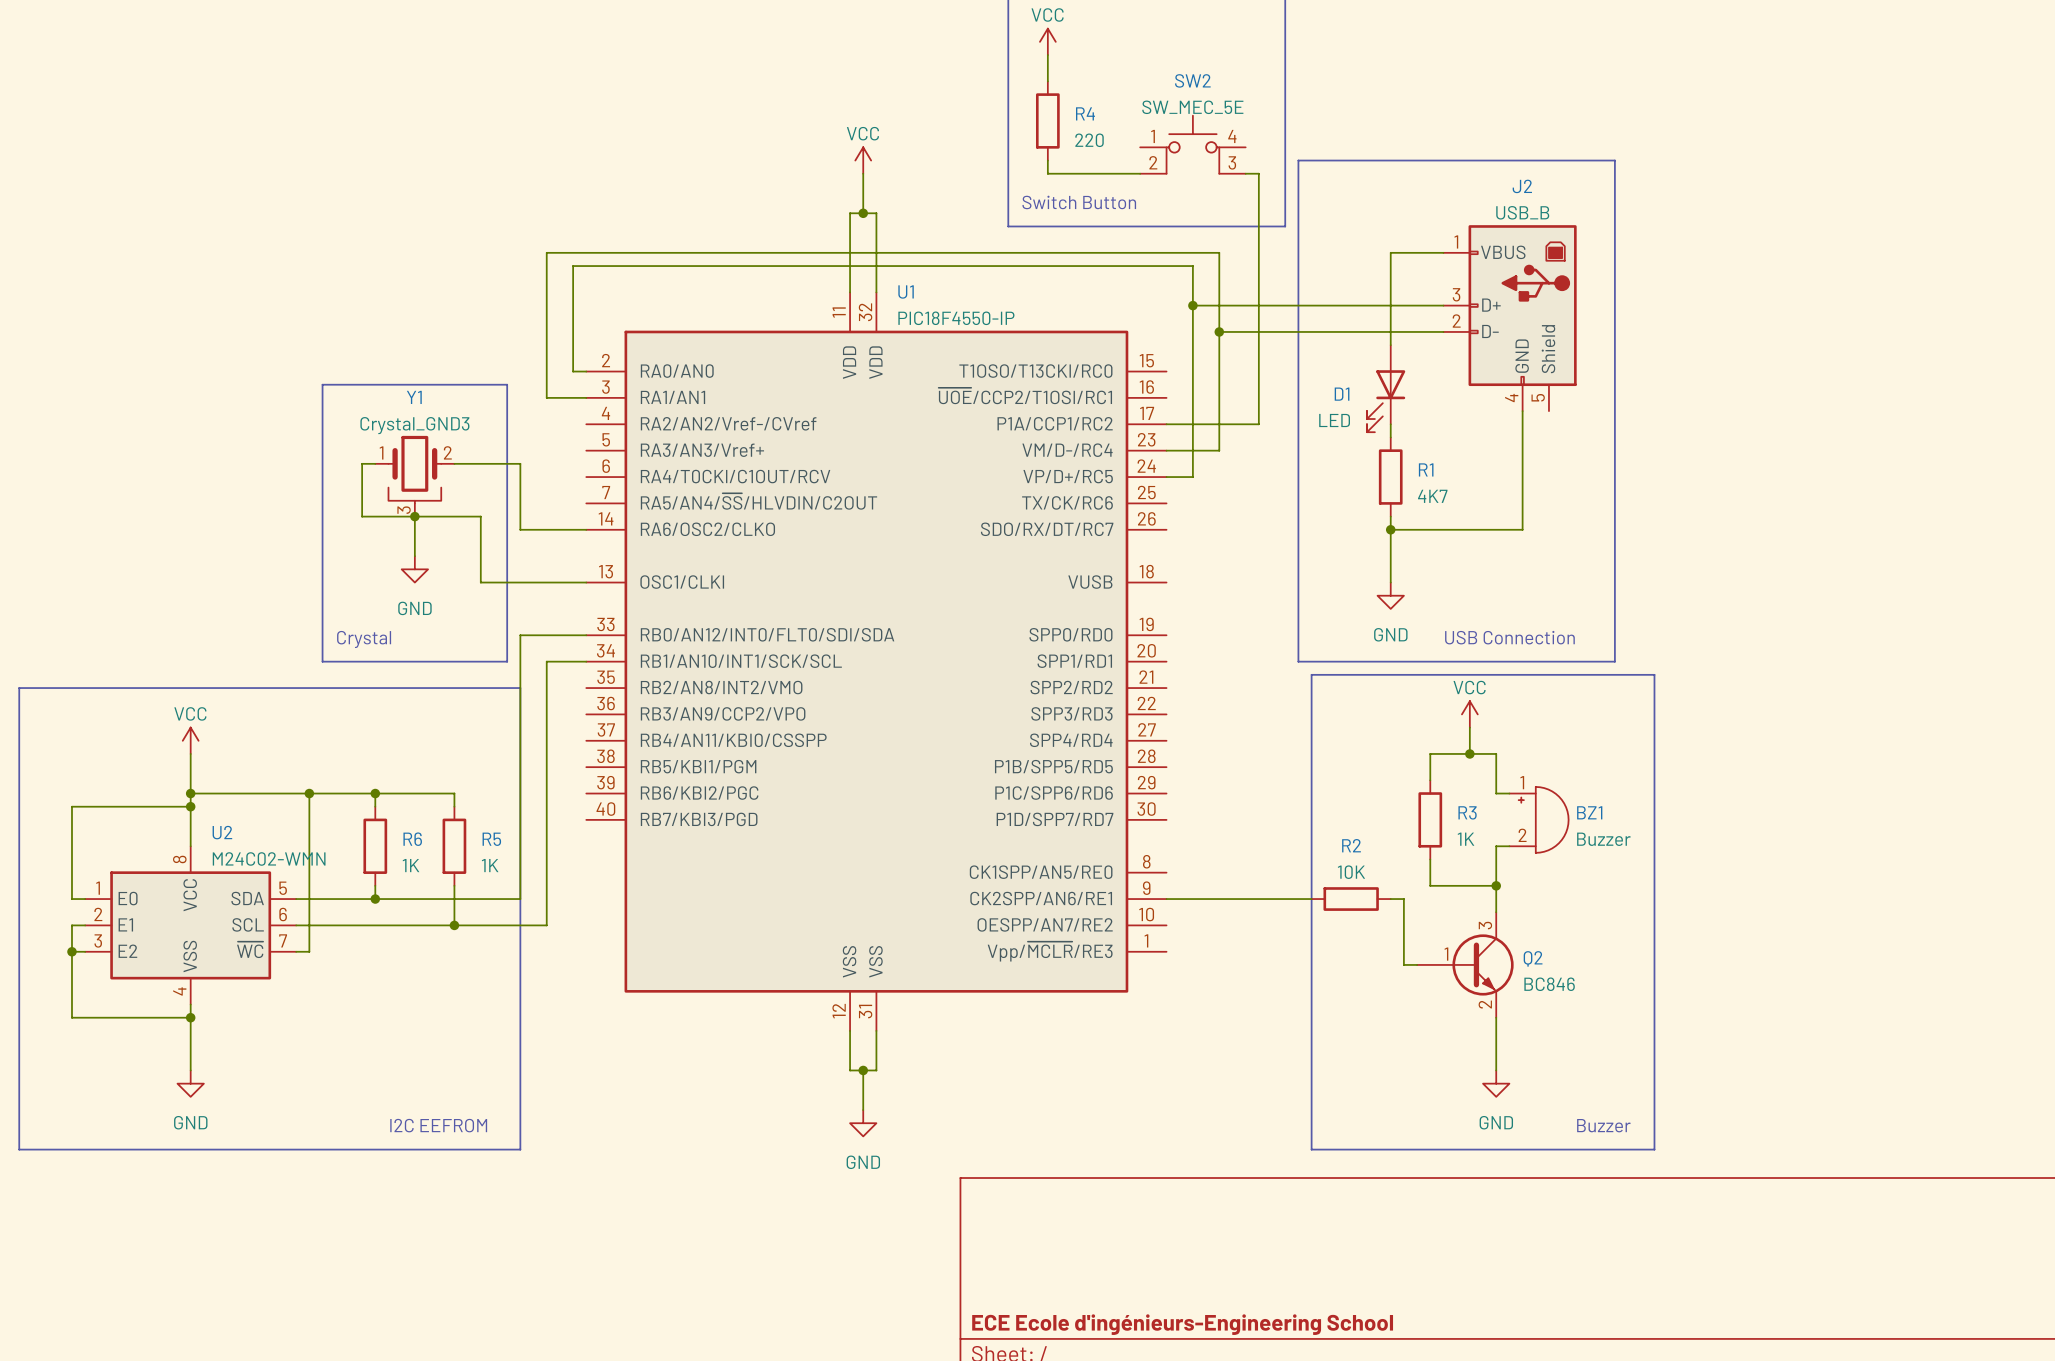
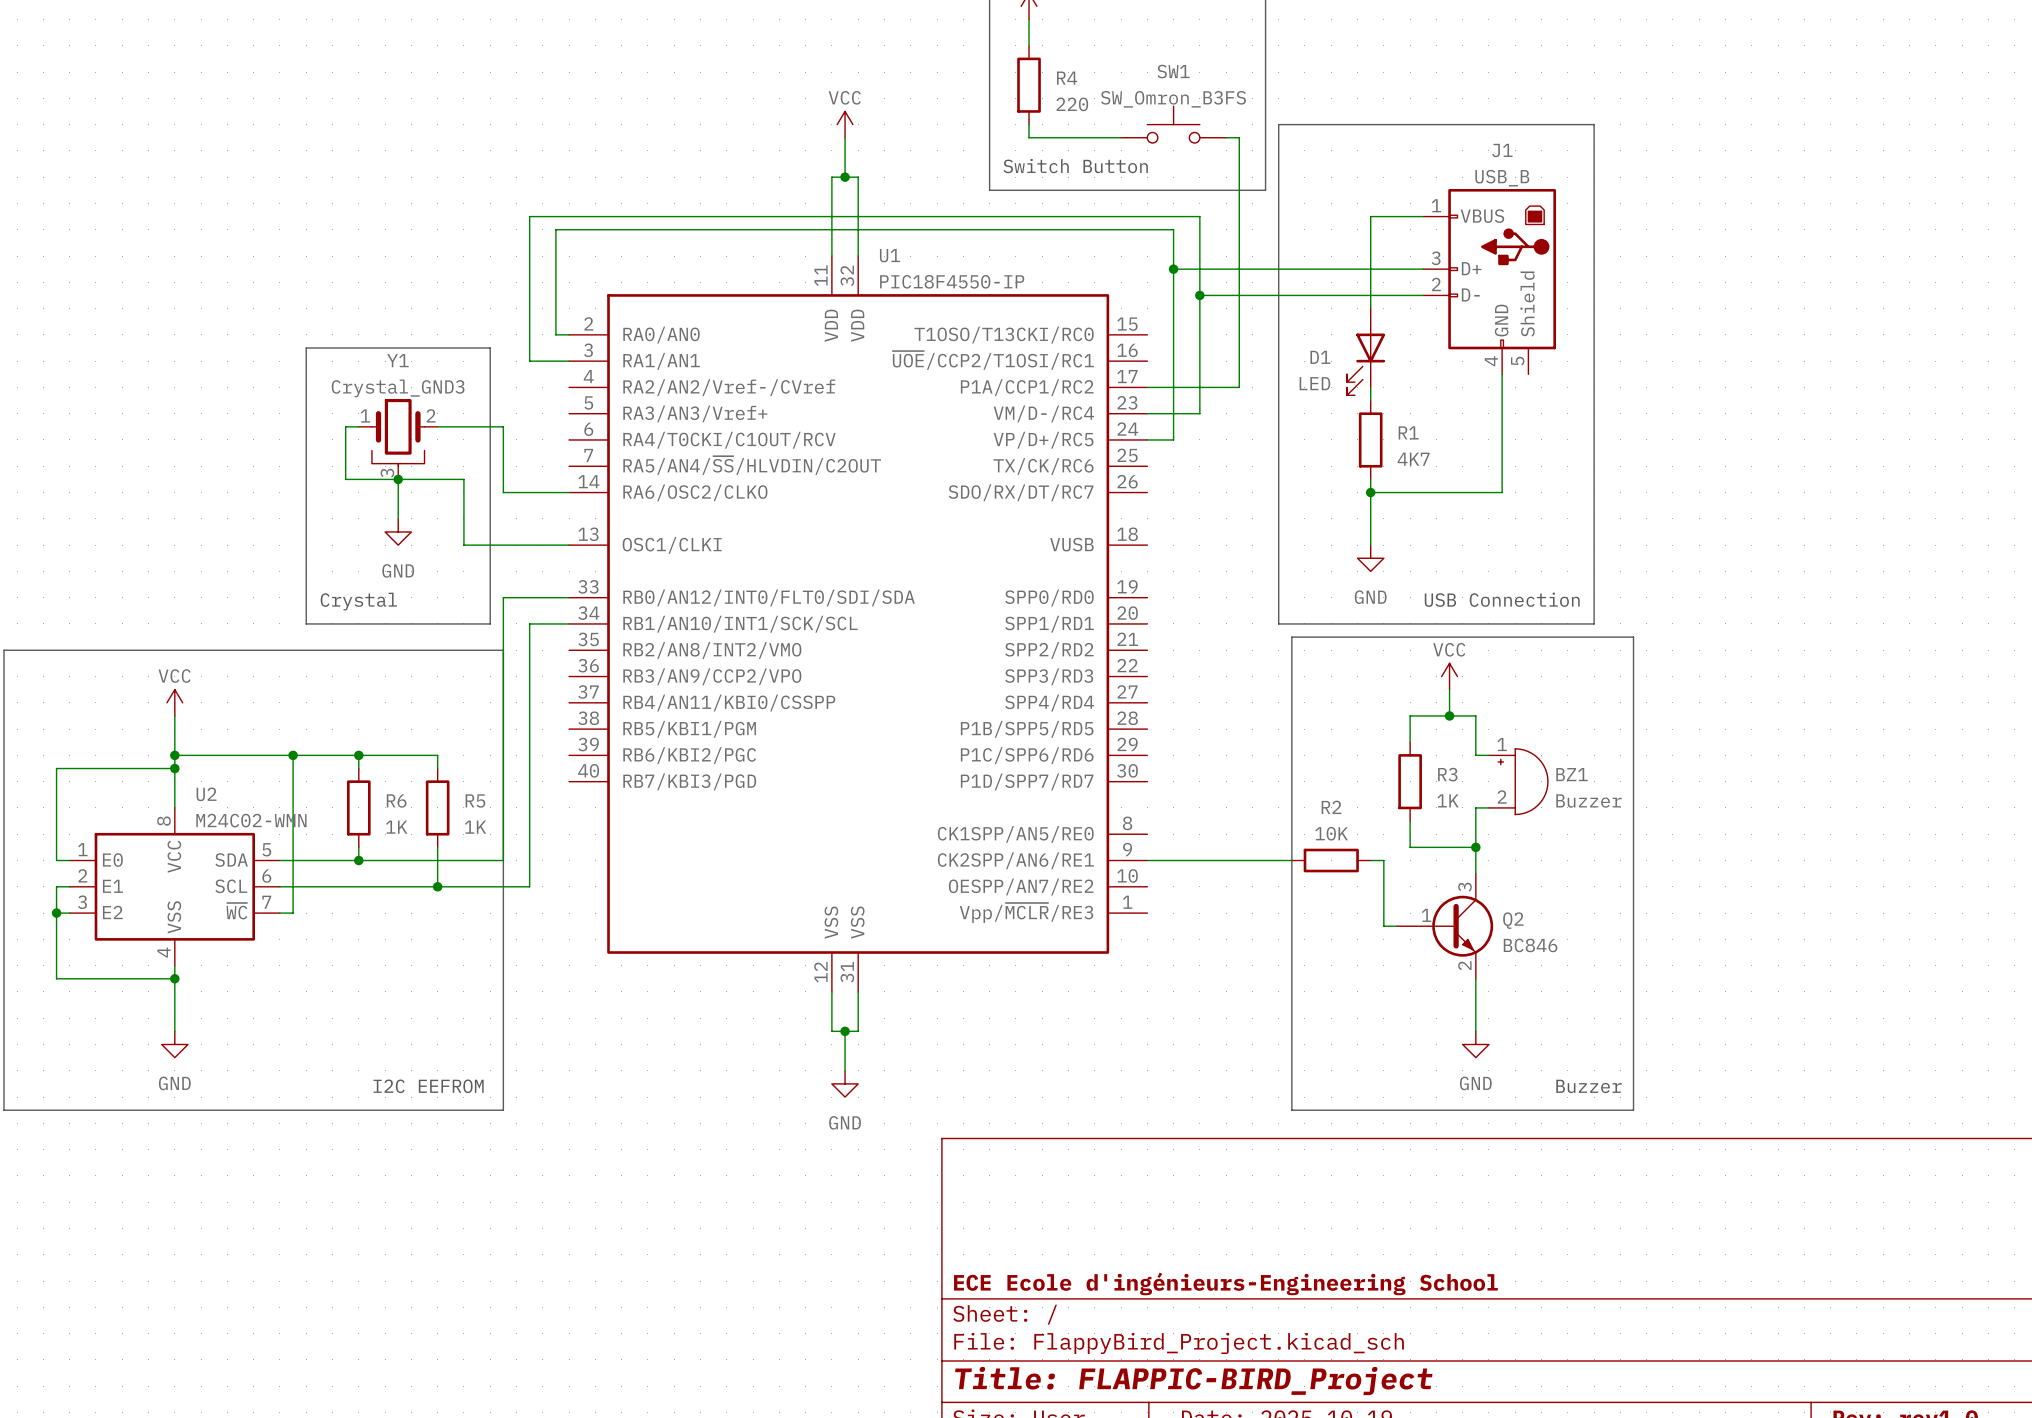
SW2: SW_MEC_5E (1192, 144) -> none
SW1: none -> SW_Omron_B3FS (1173, 124)
J2 name: J2 (1522, 186) -> J1 (1502, 150)

